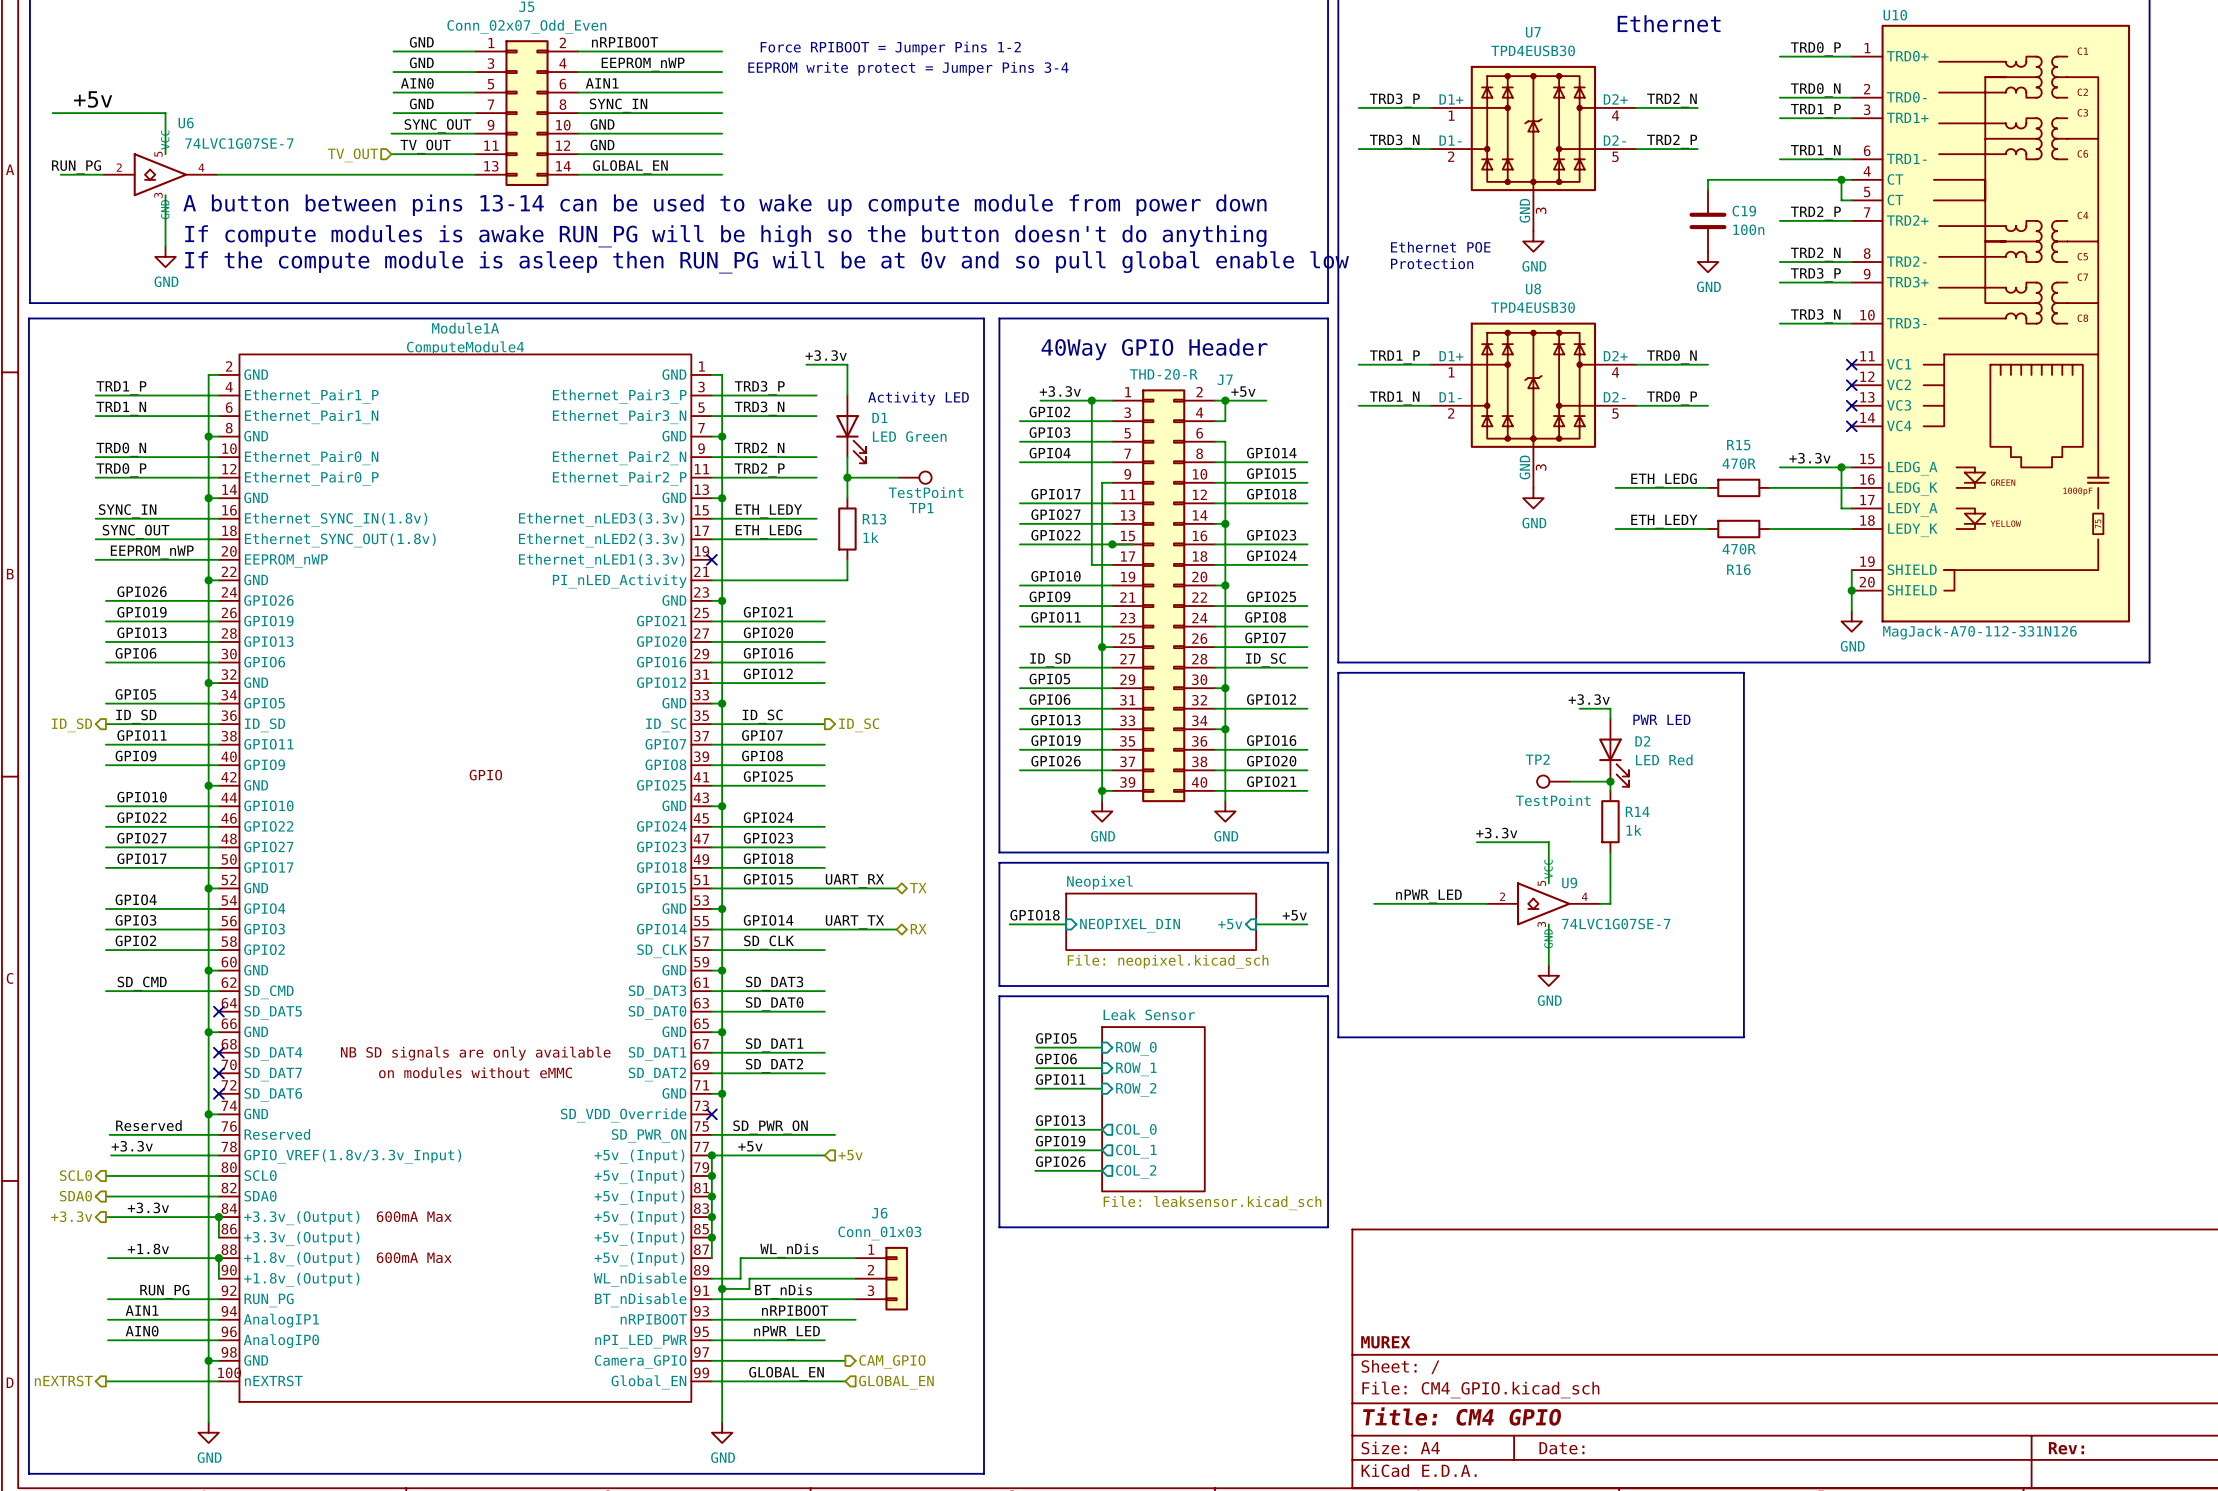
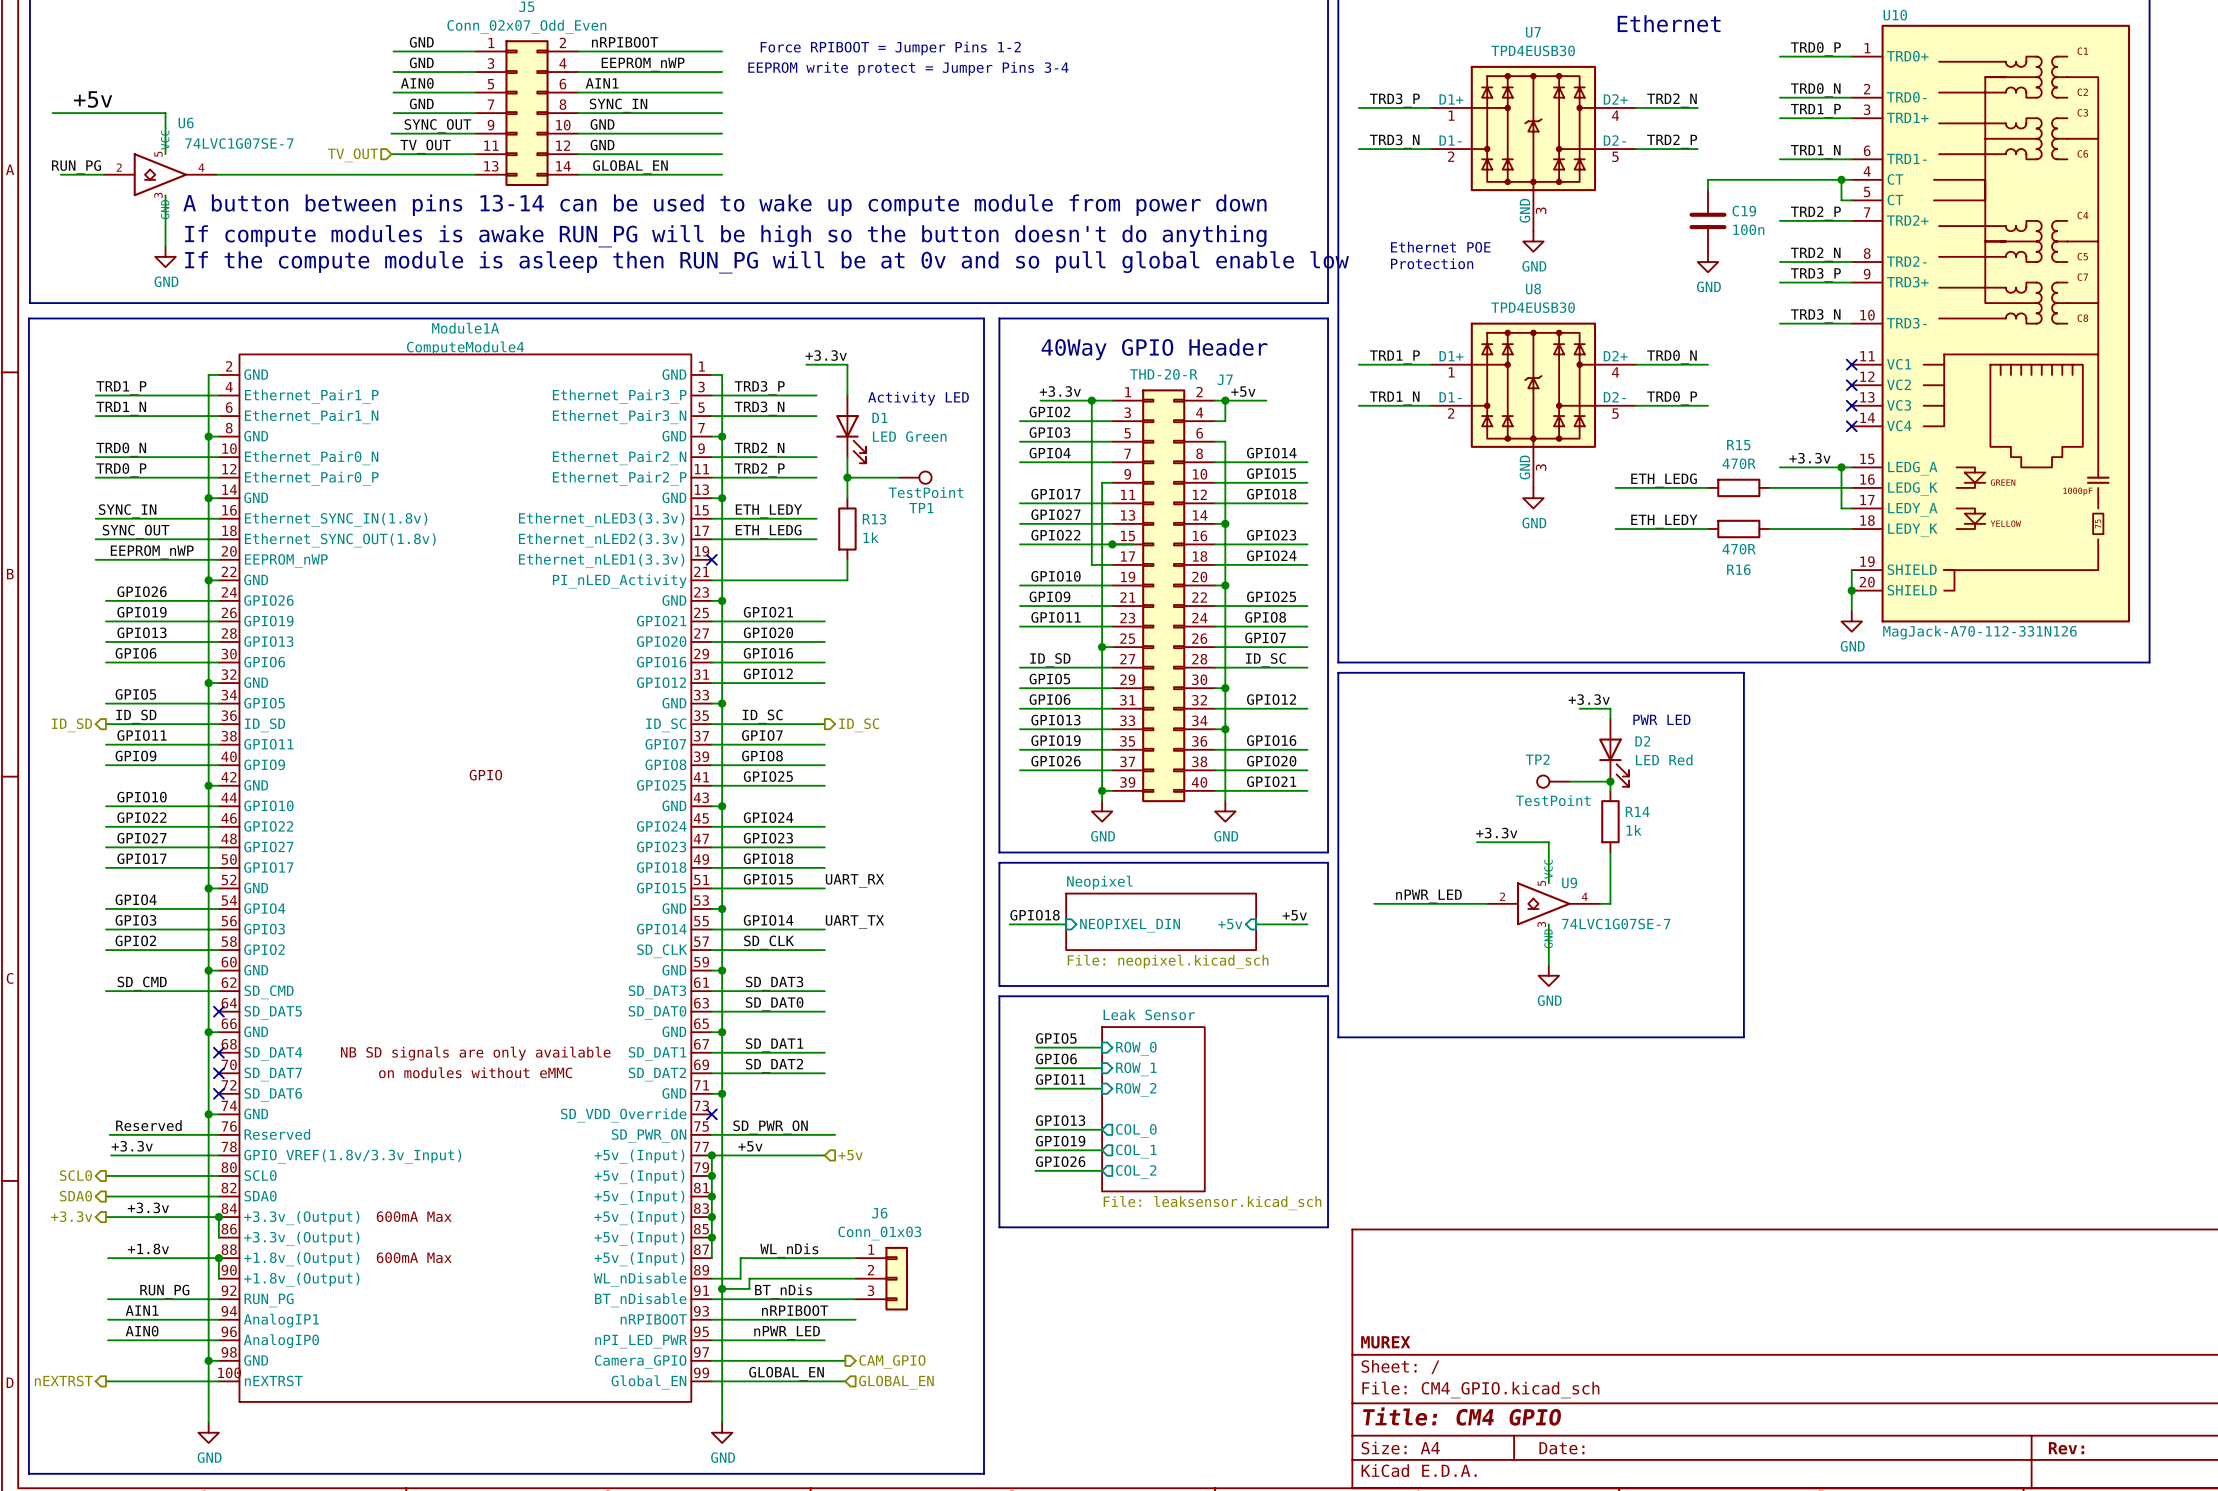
wire: (824, 888) (896, 888) -> none
hierarchical label: TX (918, 888) -> none
wire: (824, 929) (896, 929) -> none
hierarchical label: RX (918, 929) -> none

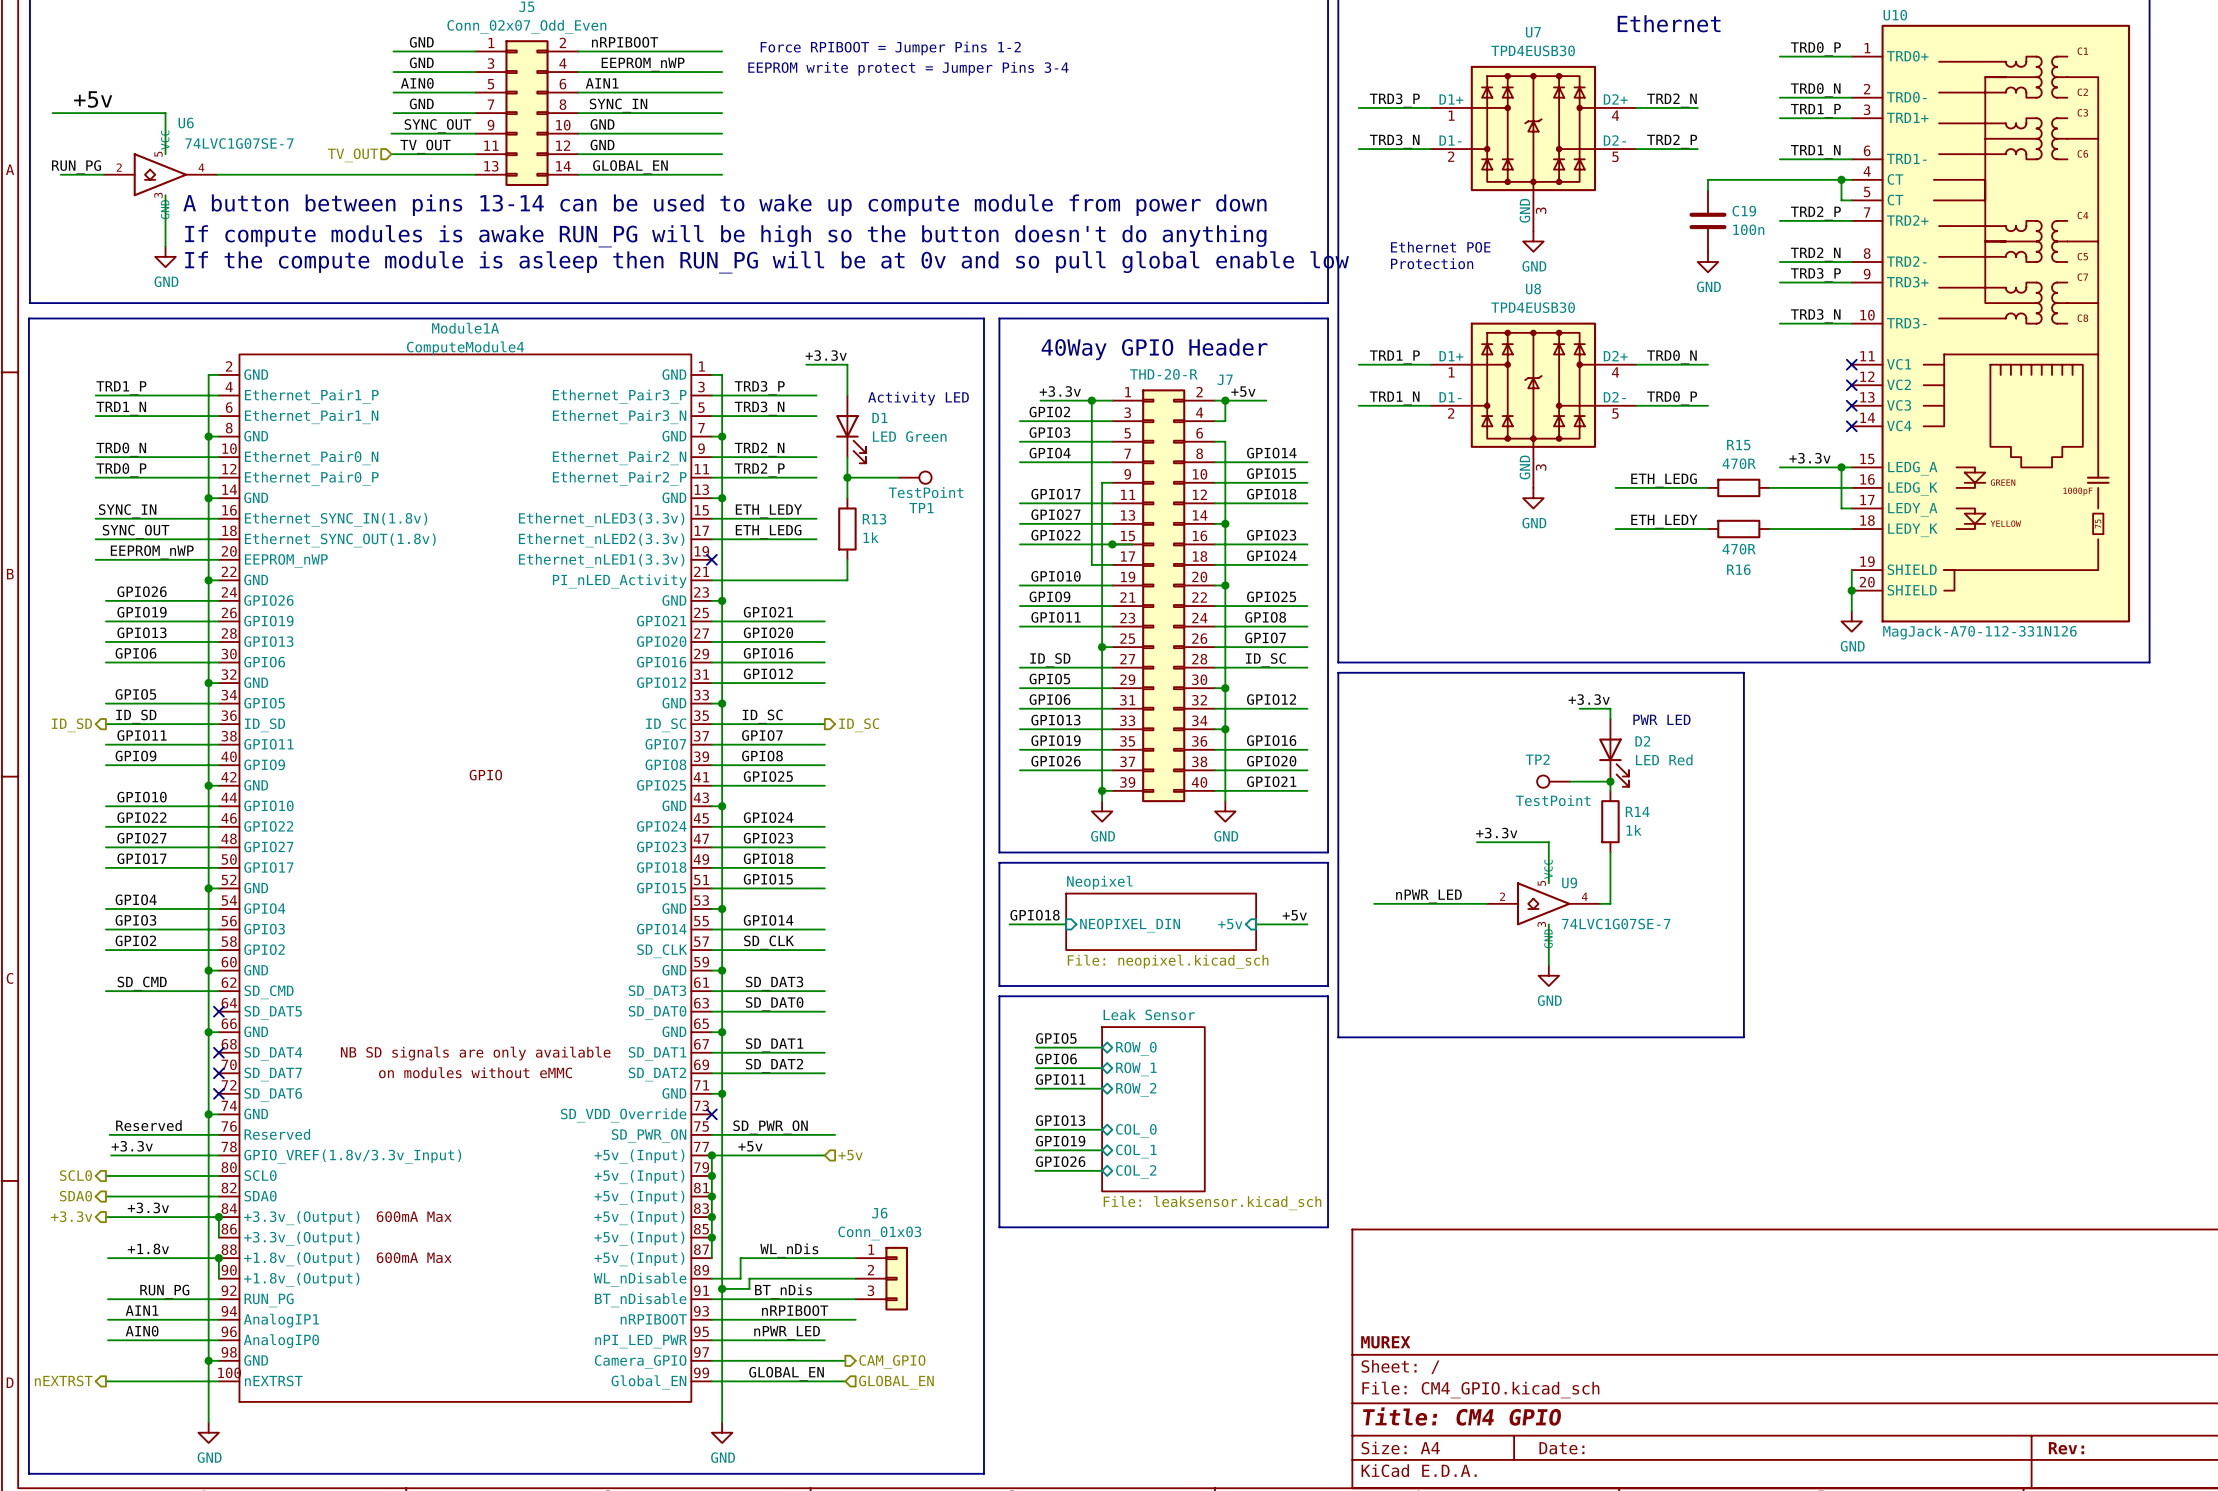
label: UART_RX (854, 880) -> none
label: UART_TX (854, 922) -> none
sheet pin shape: input (1136, 1048) -> bidirectional (1136, 1048)
sheet pin shape: input (1136, 1069) -> bidirectional (1136, 1069)
sheet pin shape: input (1136, 1089) -> bidirectional (1136, 1089)
sheet pin shape: output (1136, 1130) -> bidirectional (1136, 1130)
sheet pin shape: output (1136, 1151) -> bidirectional (1136, 1151)
sheet pin shape: output (1136, 1172) -> bidirectional (1136, 1172)

